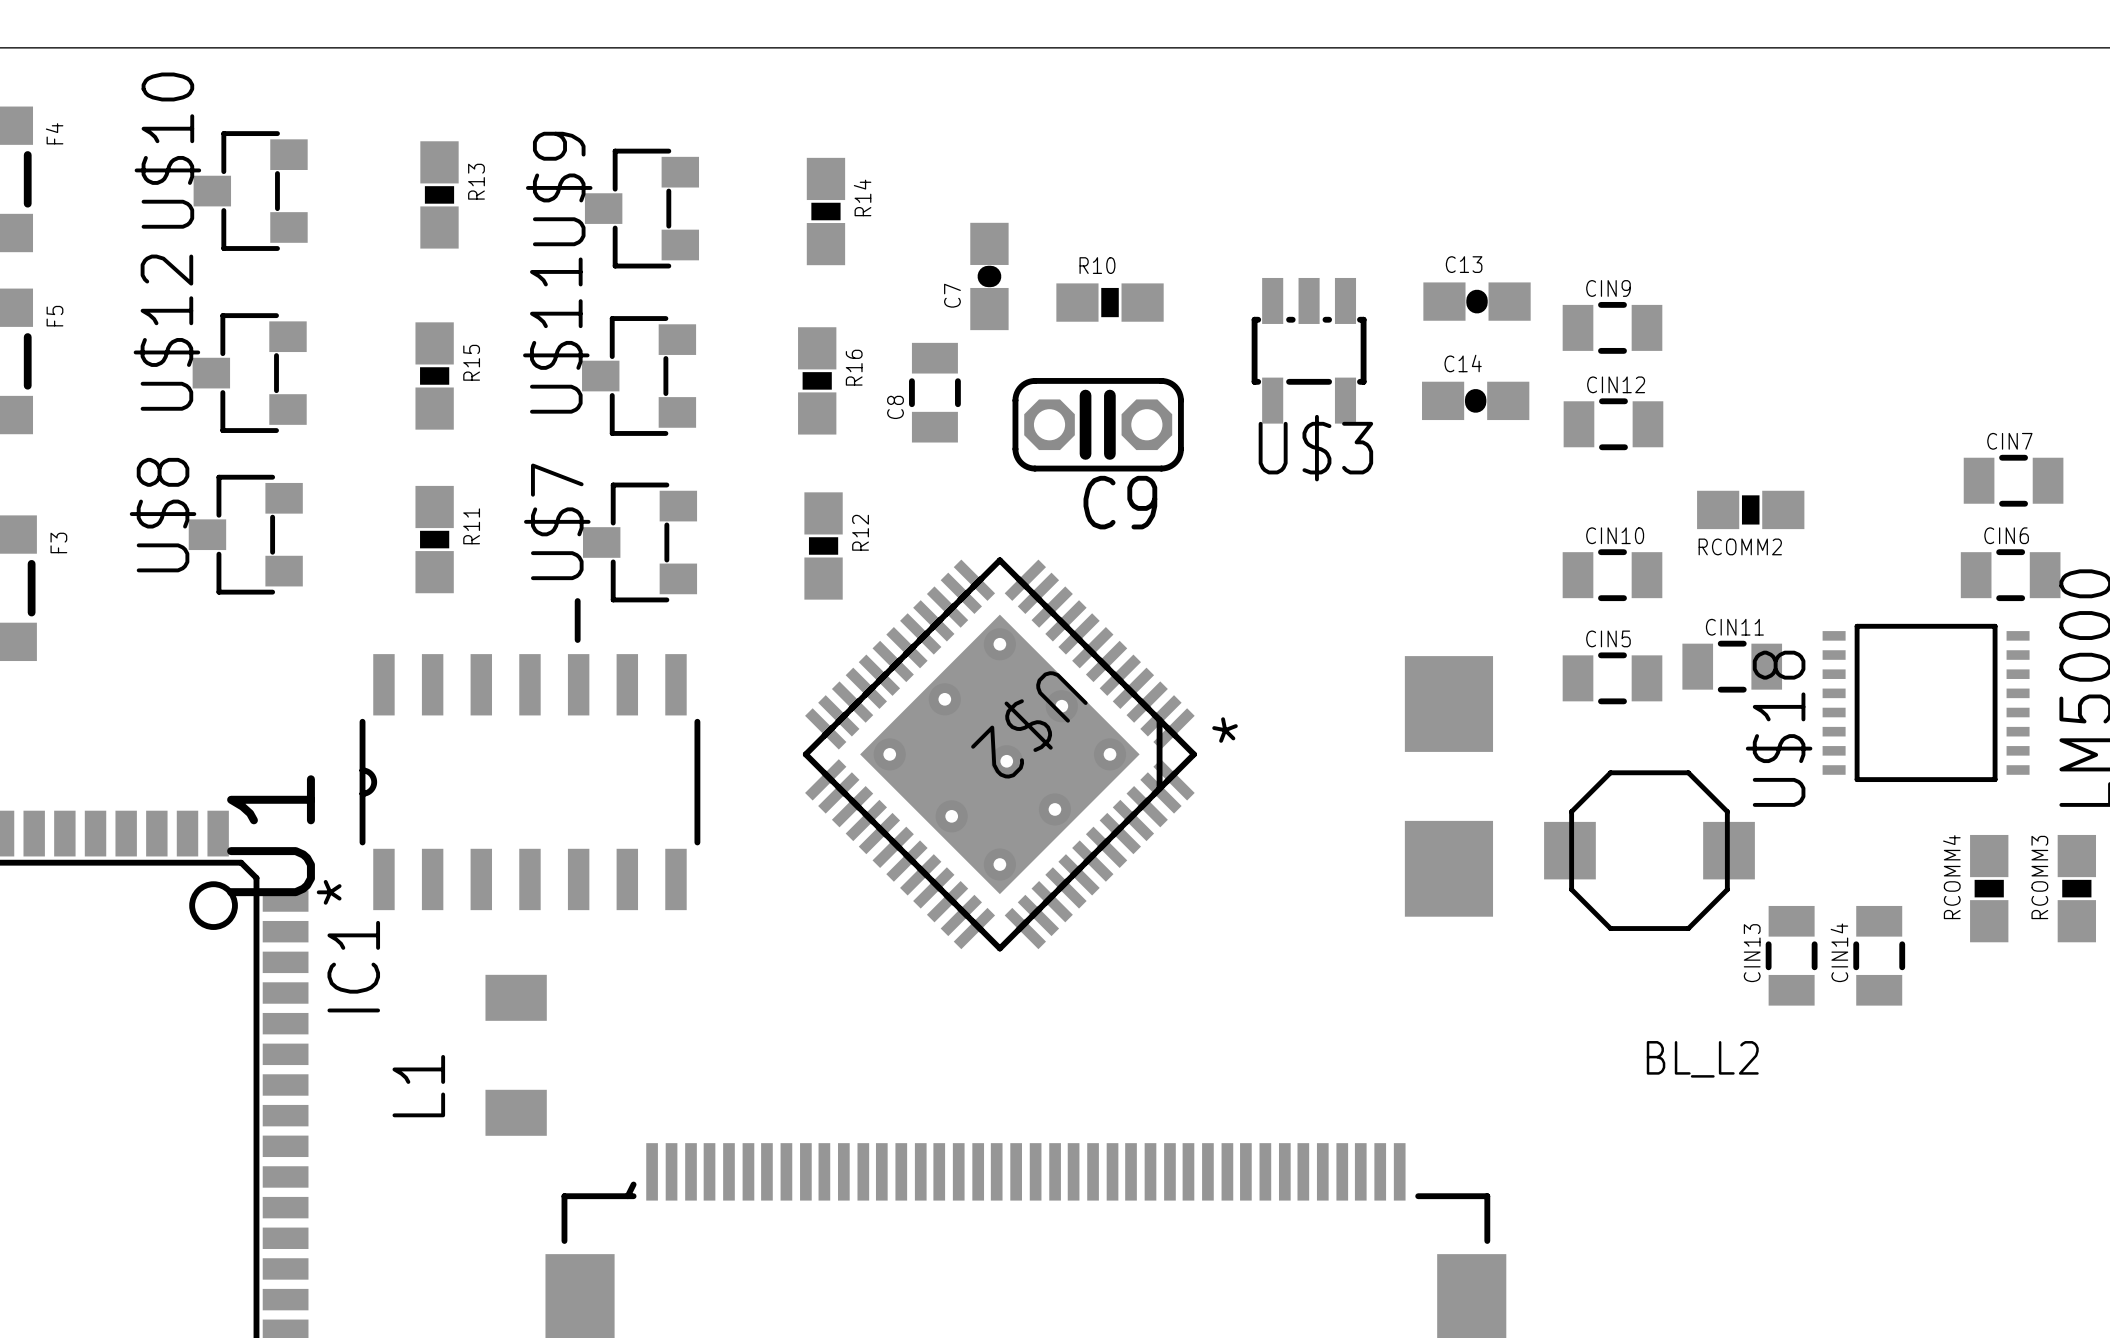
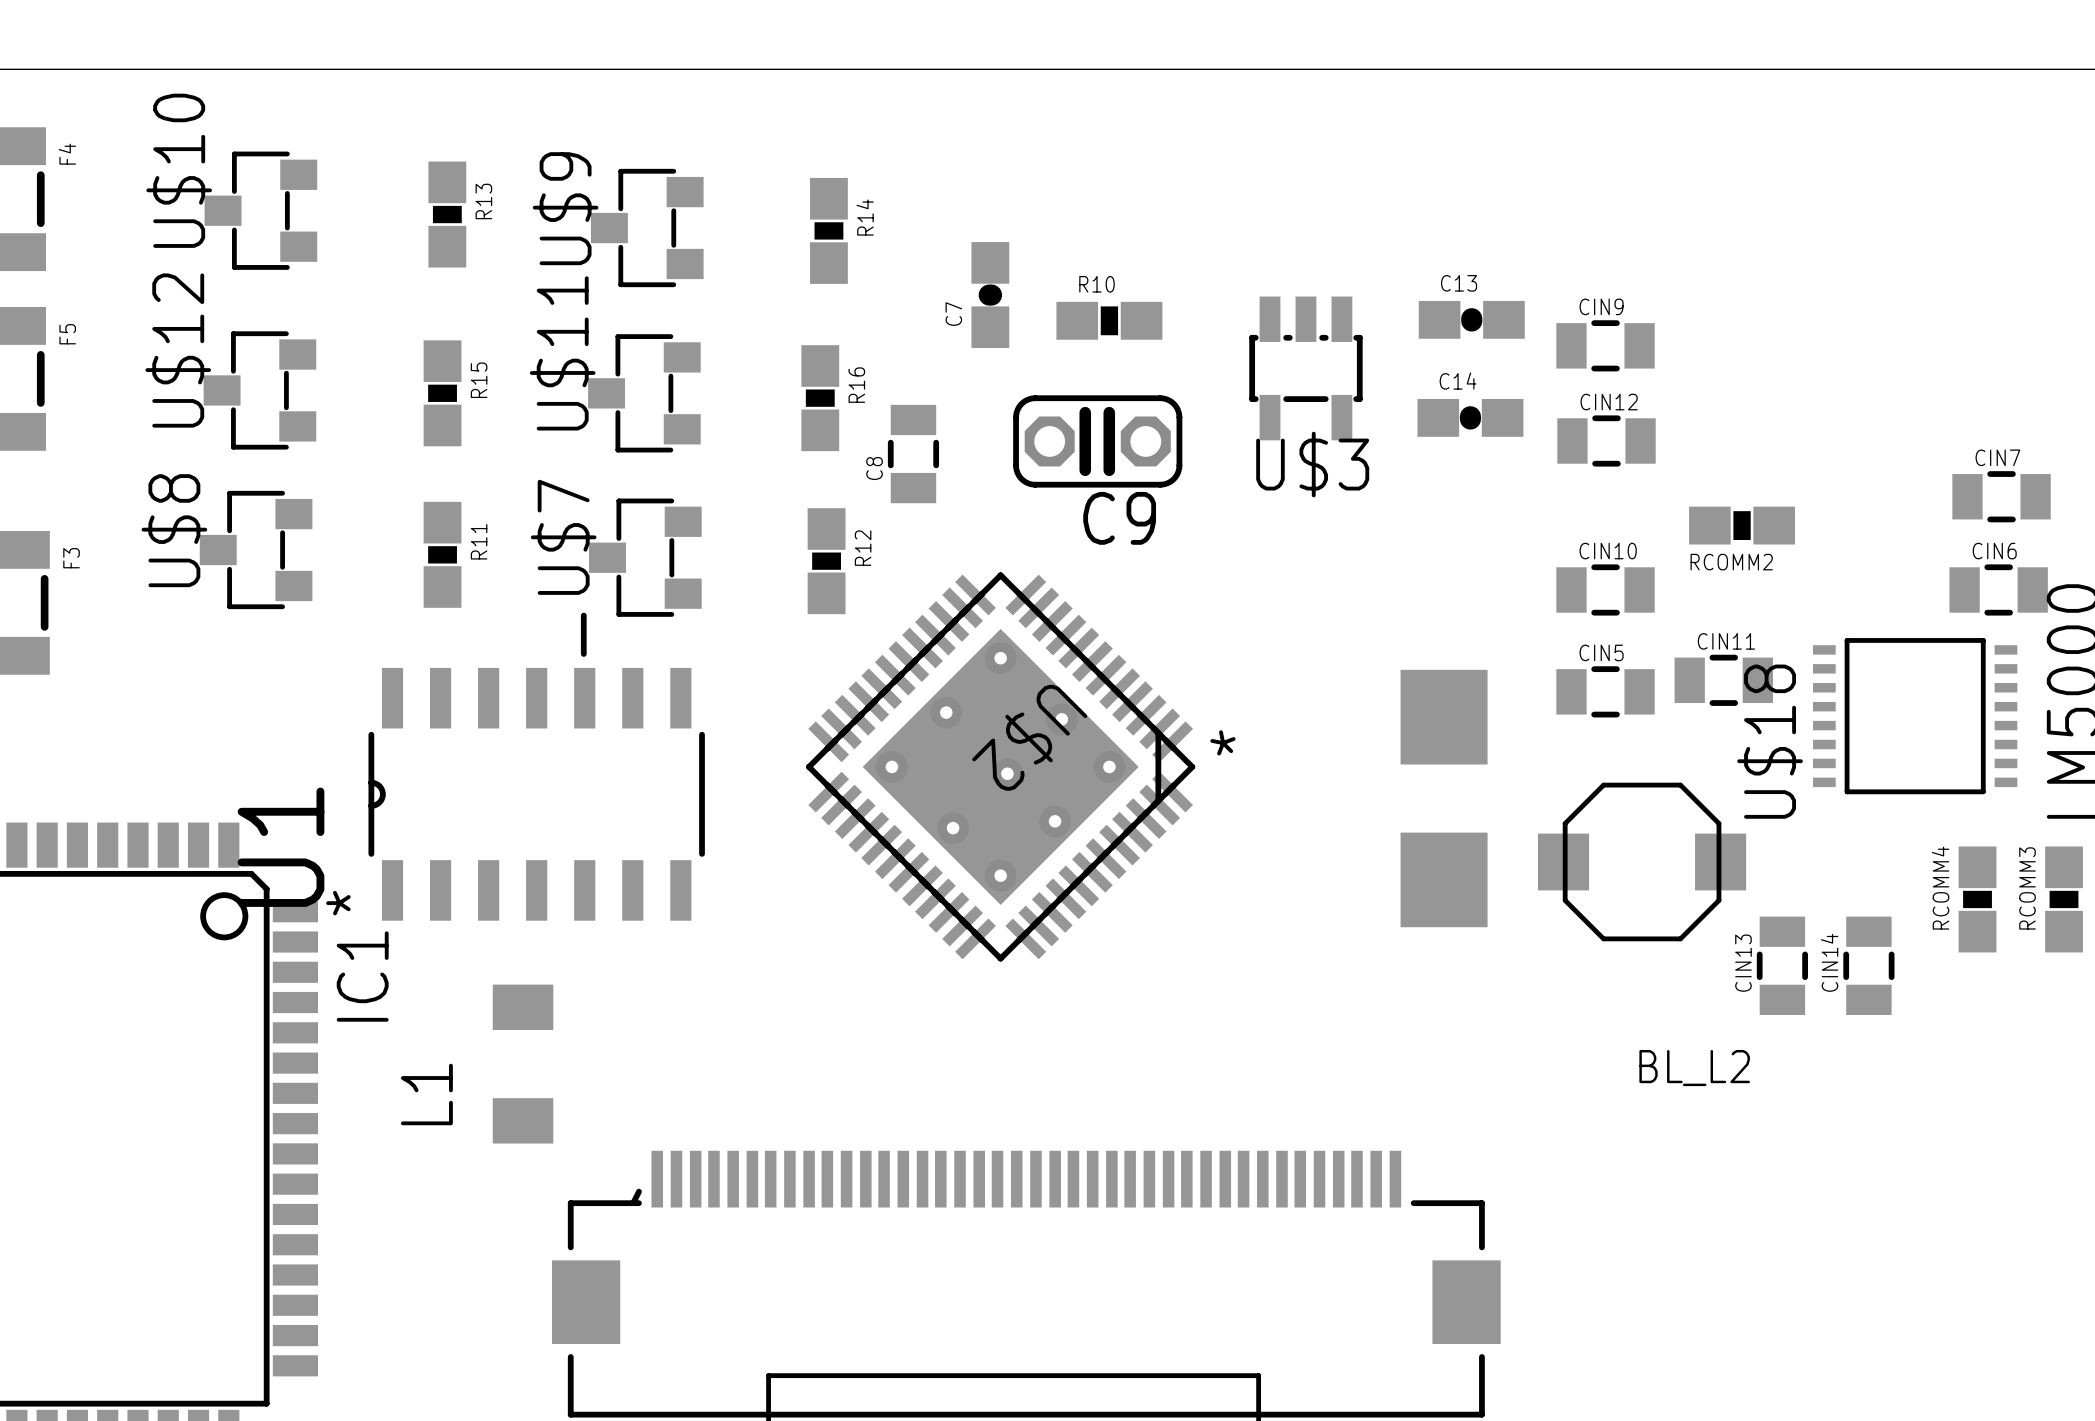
C8 position: (934, 392) -> (913, 454)

